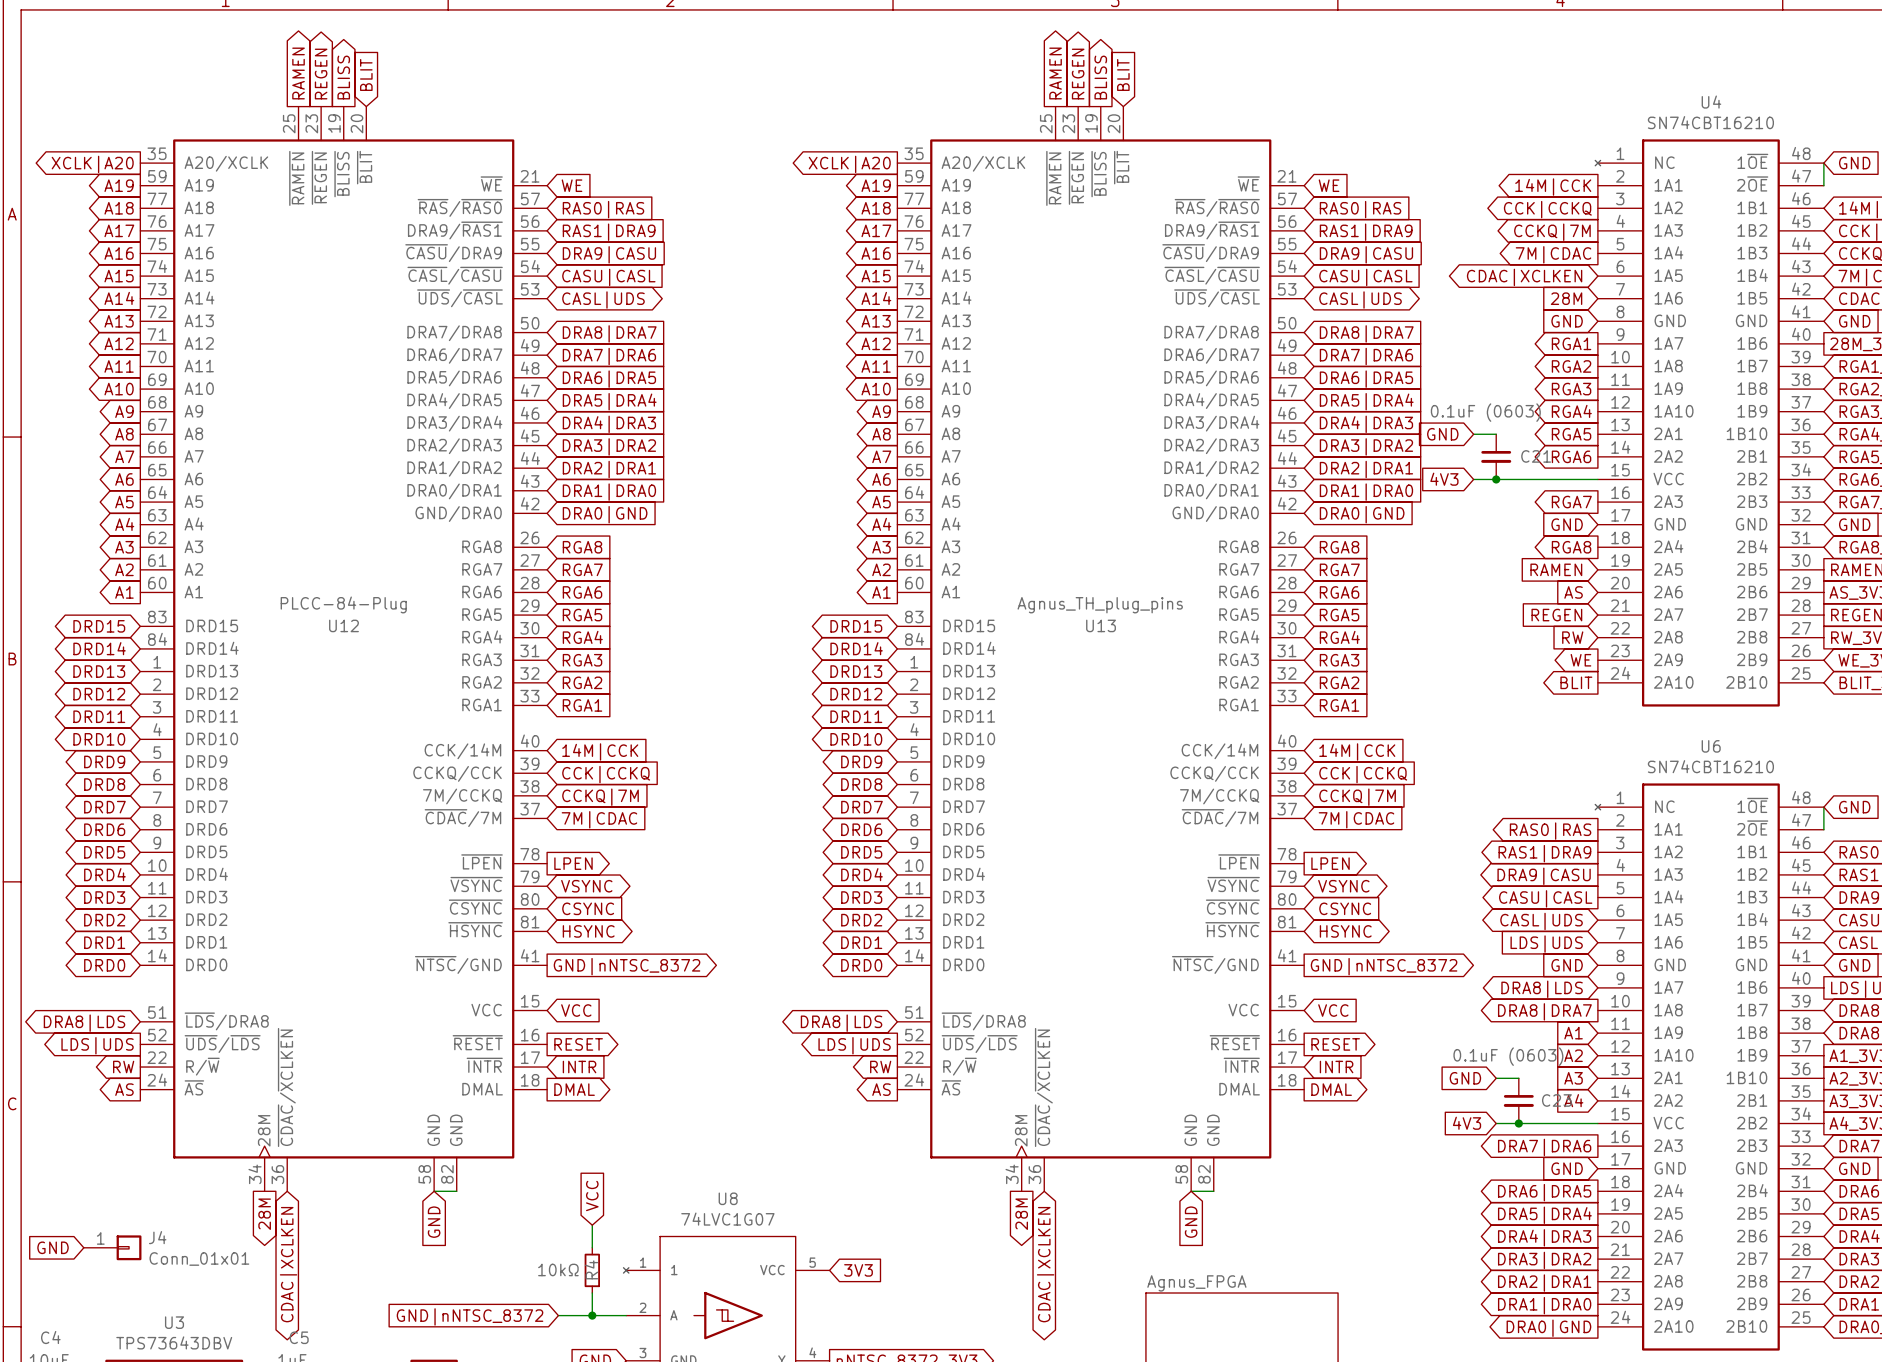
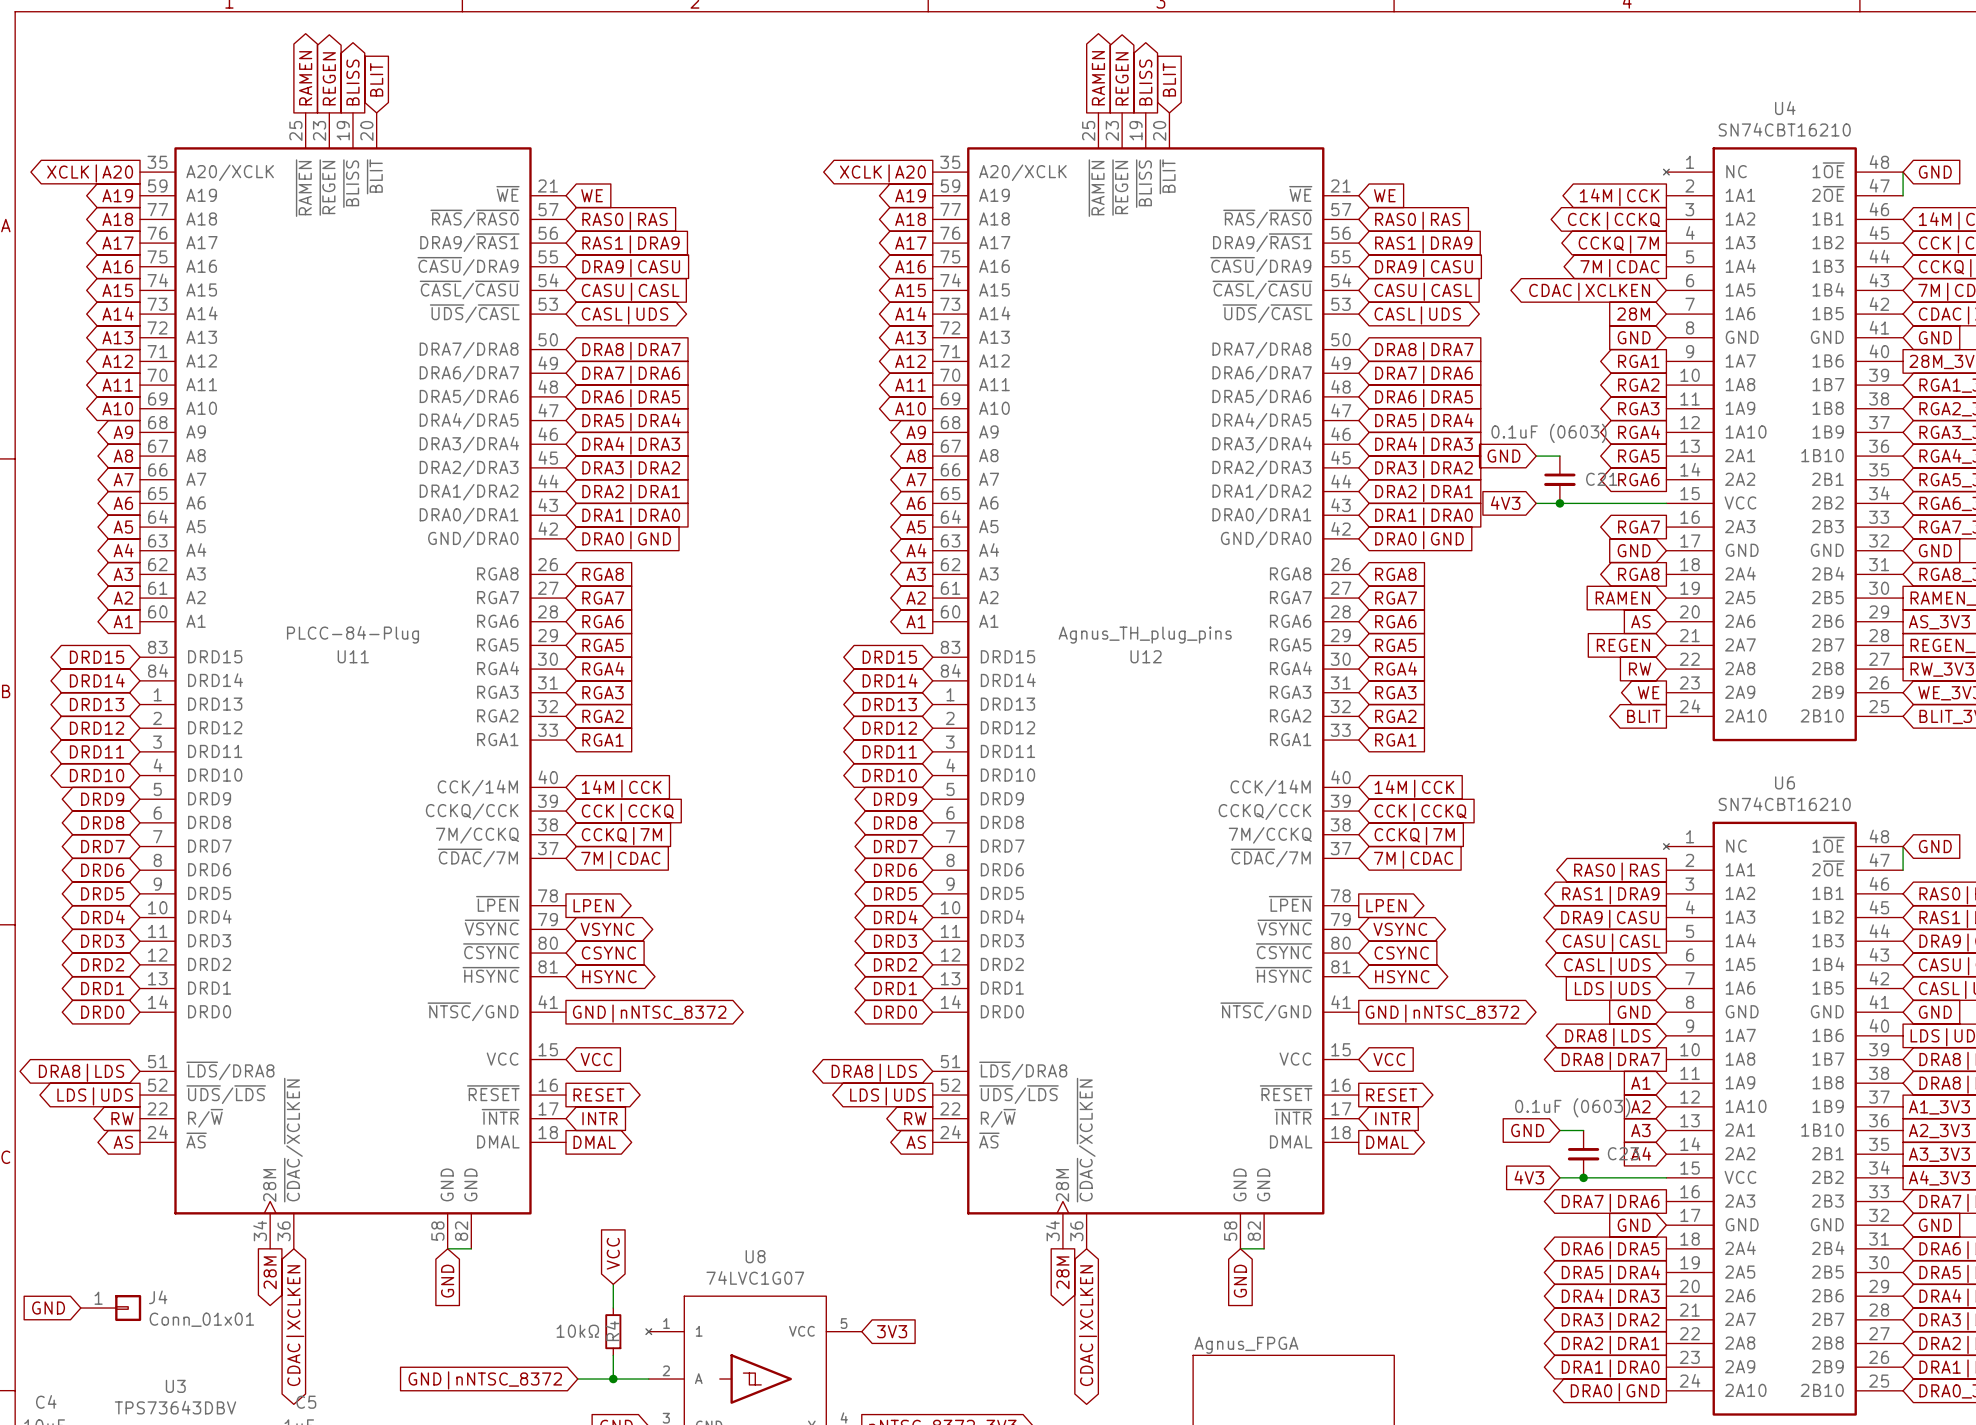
U12 name: U12 (343, 625) -> U11 (353, 656)
U13 name: U13 (1101, 625) -> U12 (1146, 656)

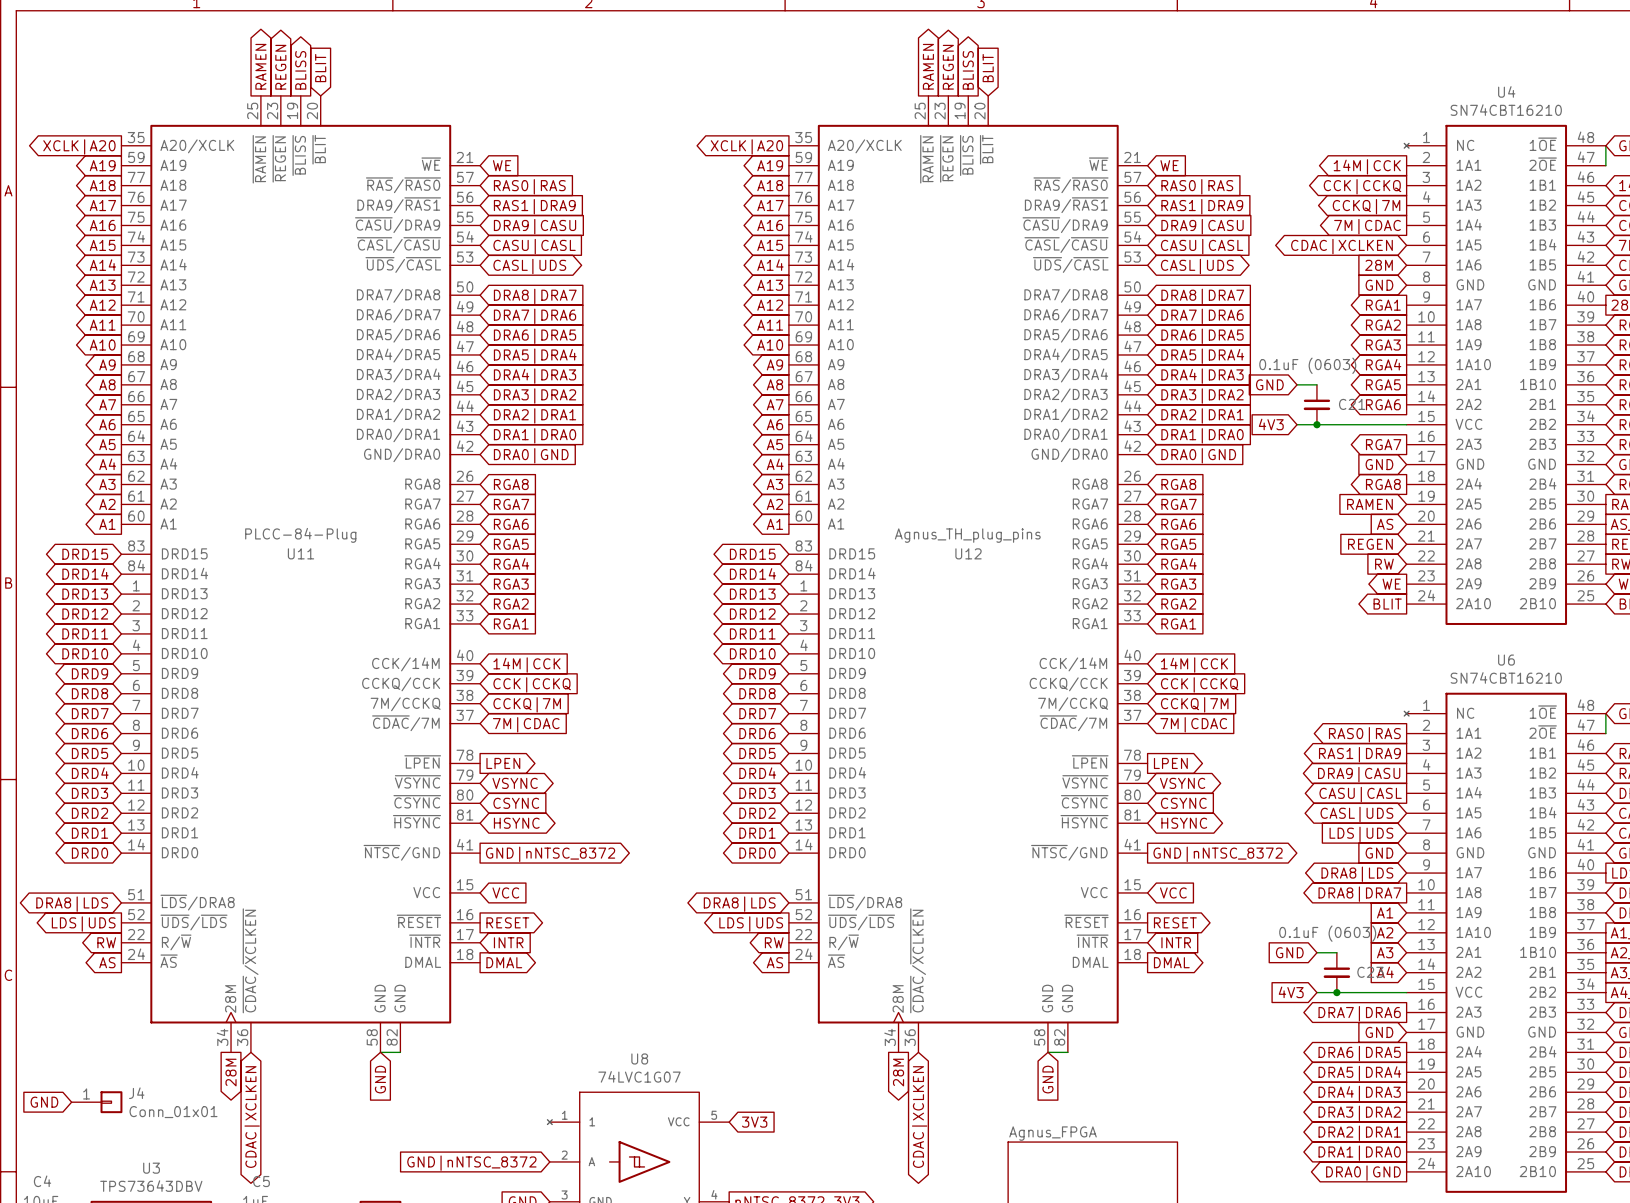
global label: VCC (613, 1253) -> none
wire: (613, 1284) (613, 1308) -> none
R4: 10kΩ (613, 1331) -> none
wire: (613, 1355) (613, 1379) -> none
wire: (577, 1379) (648, 1379) -> none
junction: (613, 1379) -> none
global label position: GND|nNTSC_8372 (485, 1380) -> GND|nNTSC_8372 (471, 1163)

